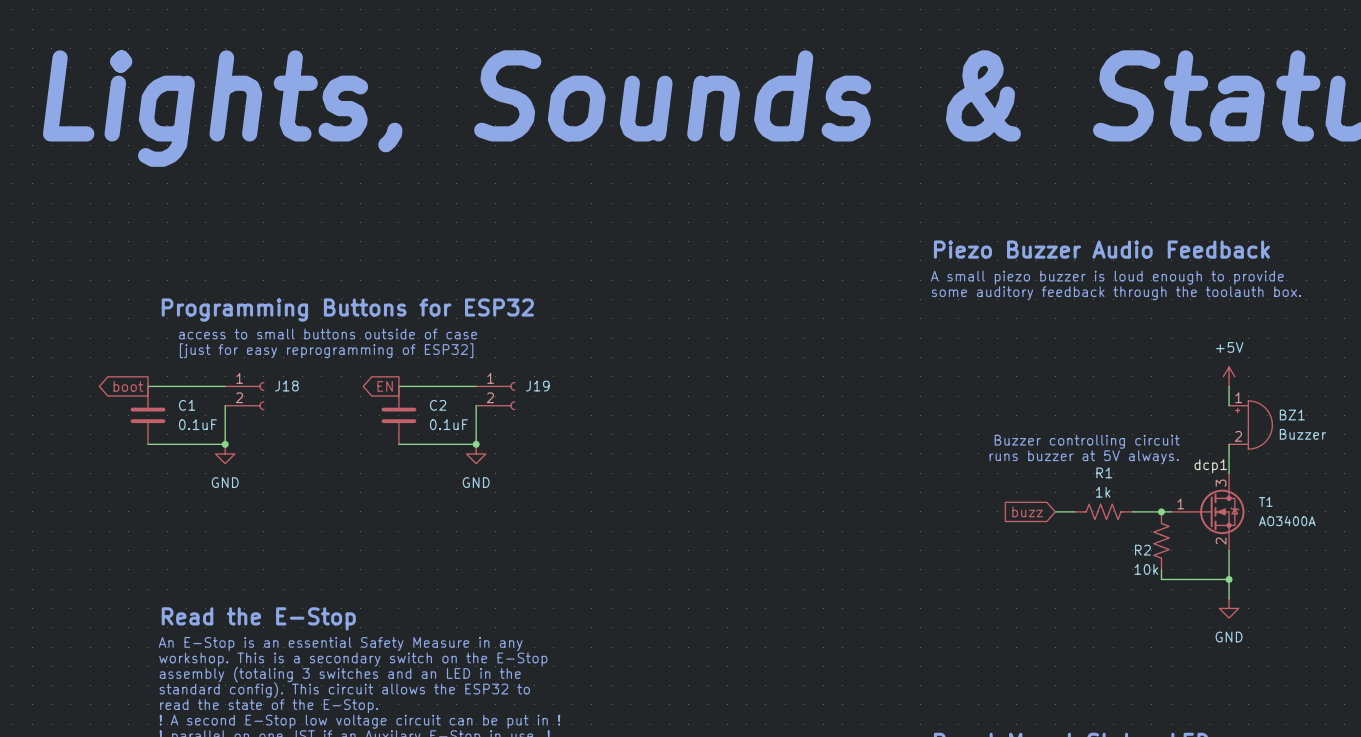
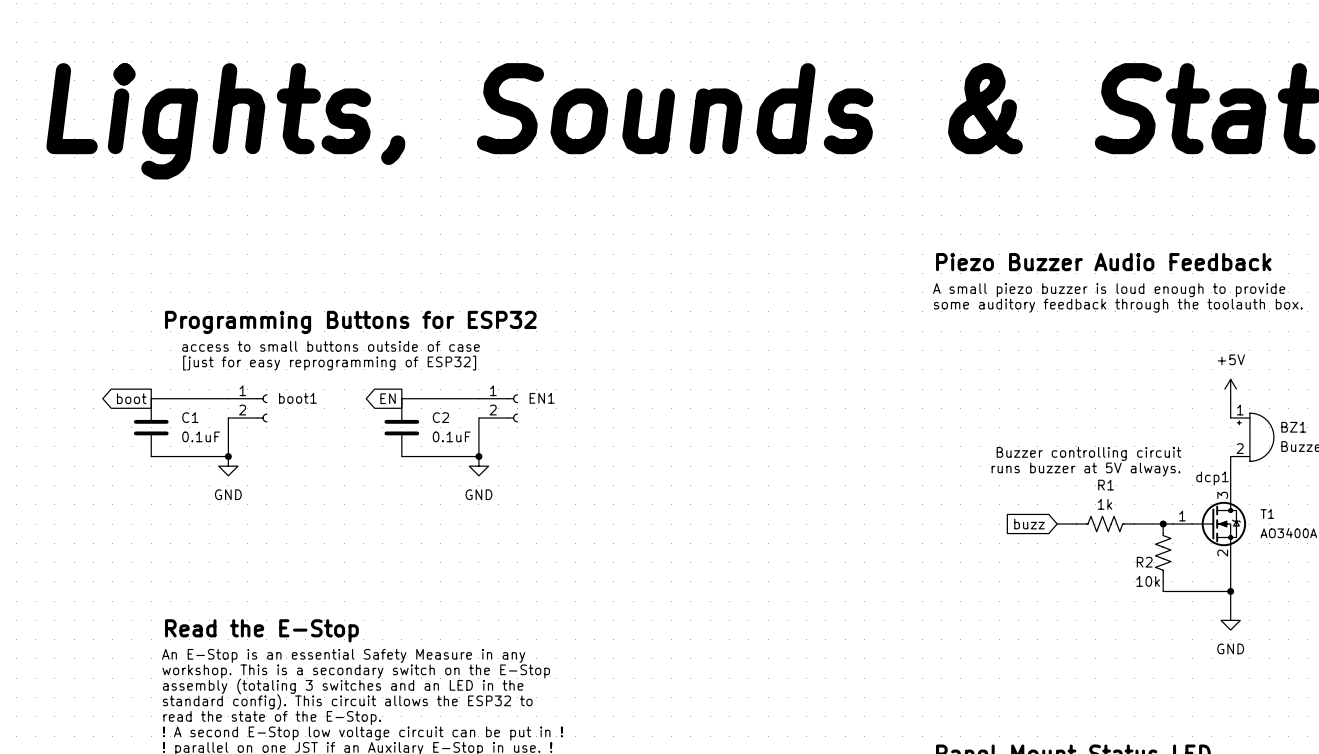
J18 name: J18 (286, 386) -> boot1 (297, 398)
J19 name: J19 (537, 386) -> EN1 (542, 398)

